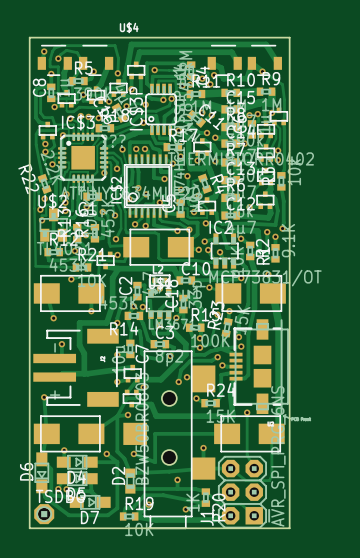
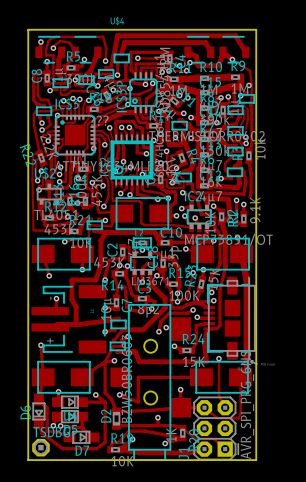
via: none -> (248, 85)
via position: (278, 150) -> (246, 143)
track: (87, 178) (87, 171) (70, 171) (66, 194) -> none
via: (282, 228) -> none

